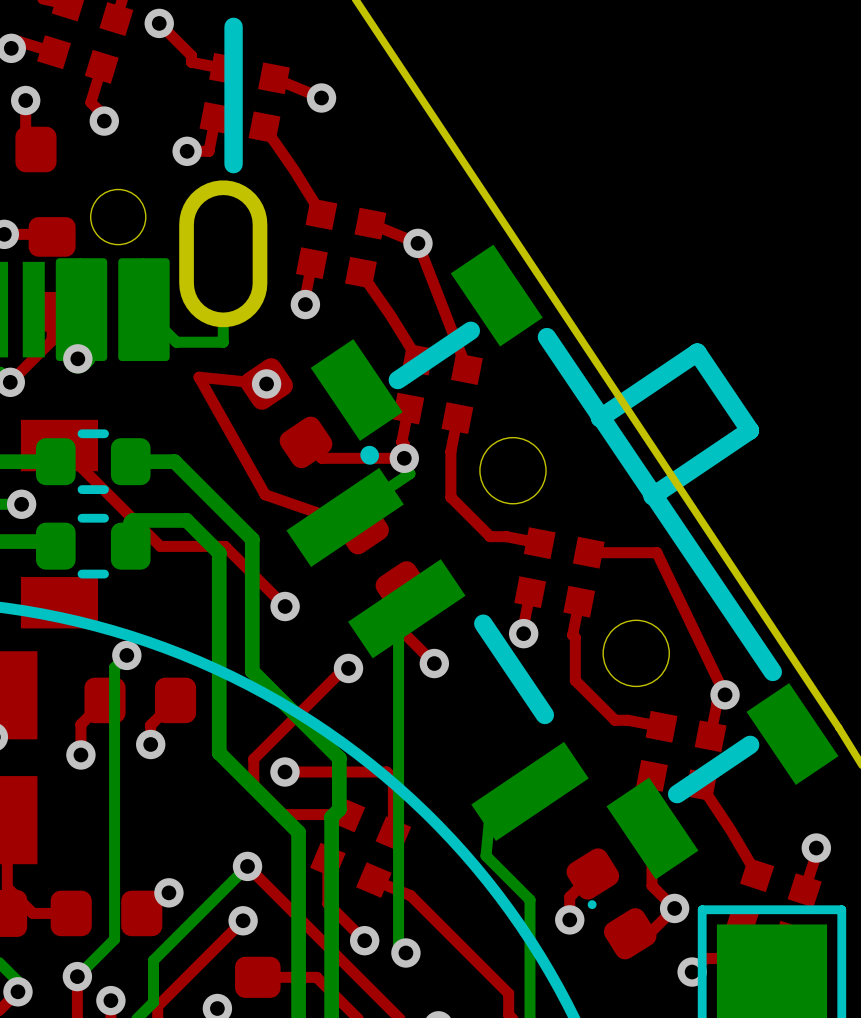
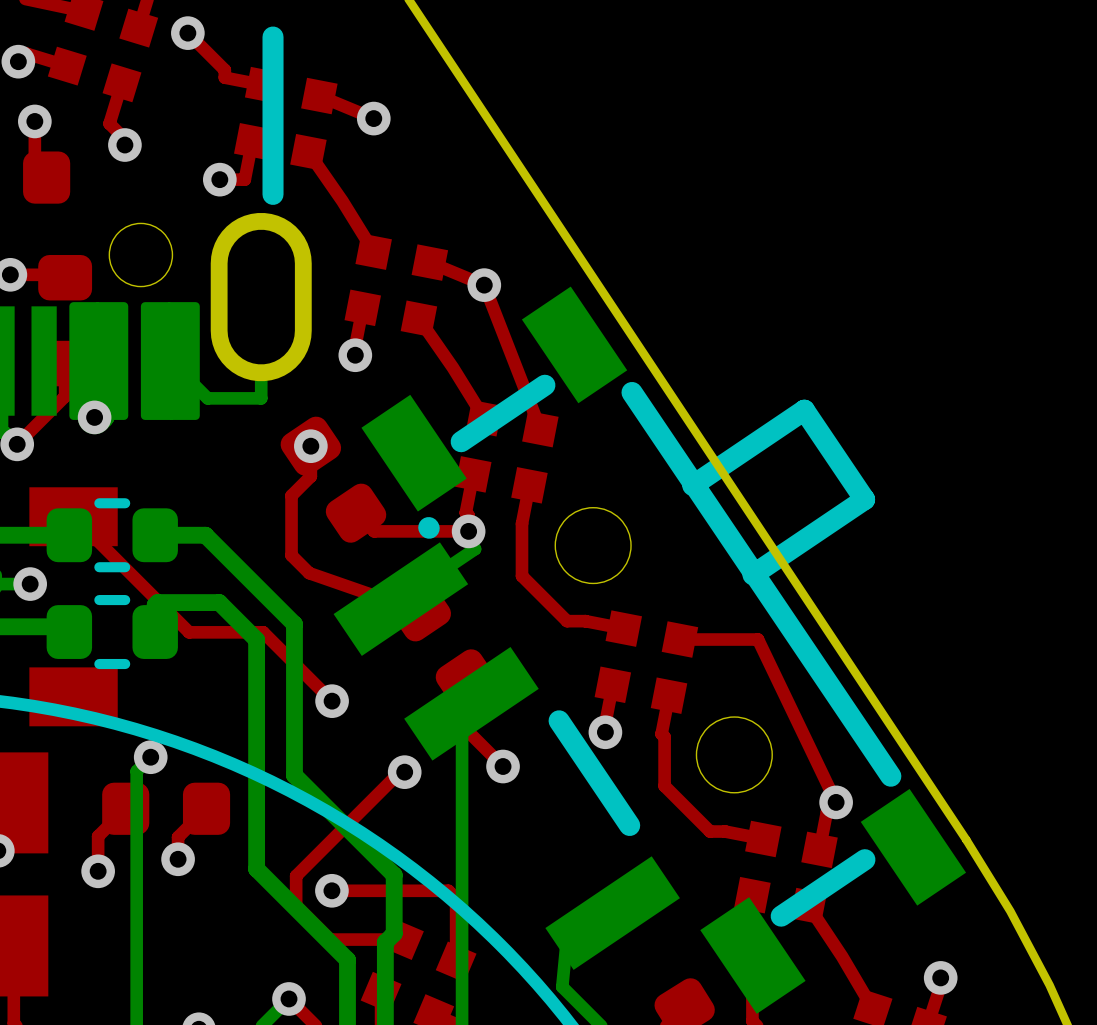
top track: (266, 383) (199, 377) (265, 494) -> (310, 446) (310, 476) (291, 495) (291, 555) (309, 573)

